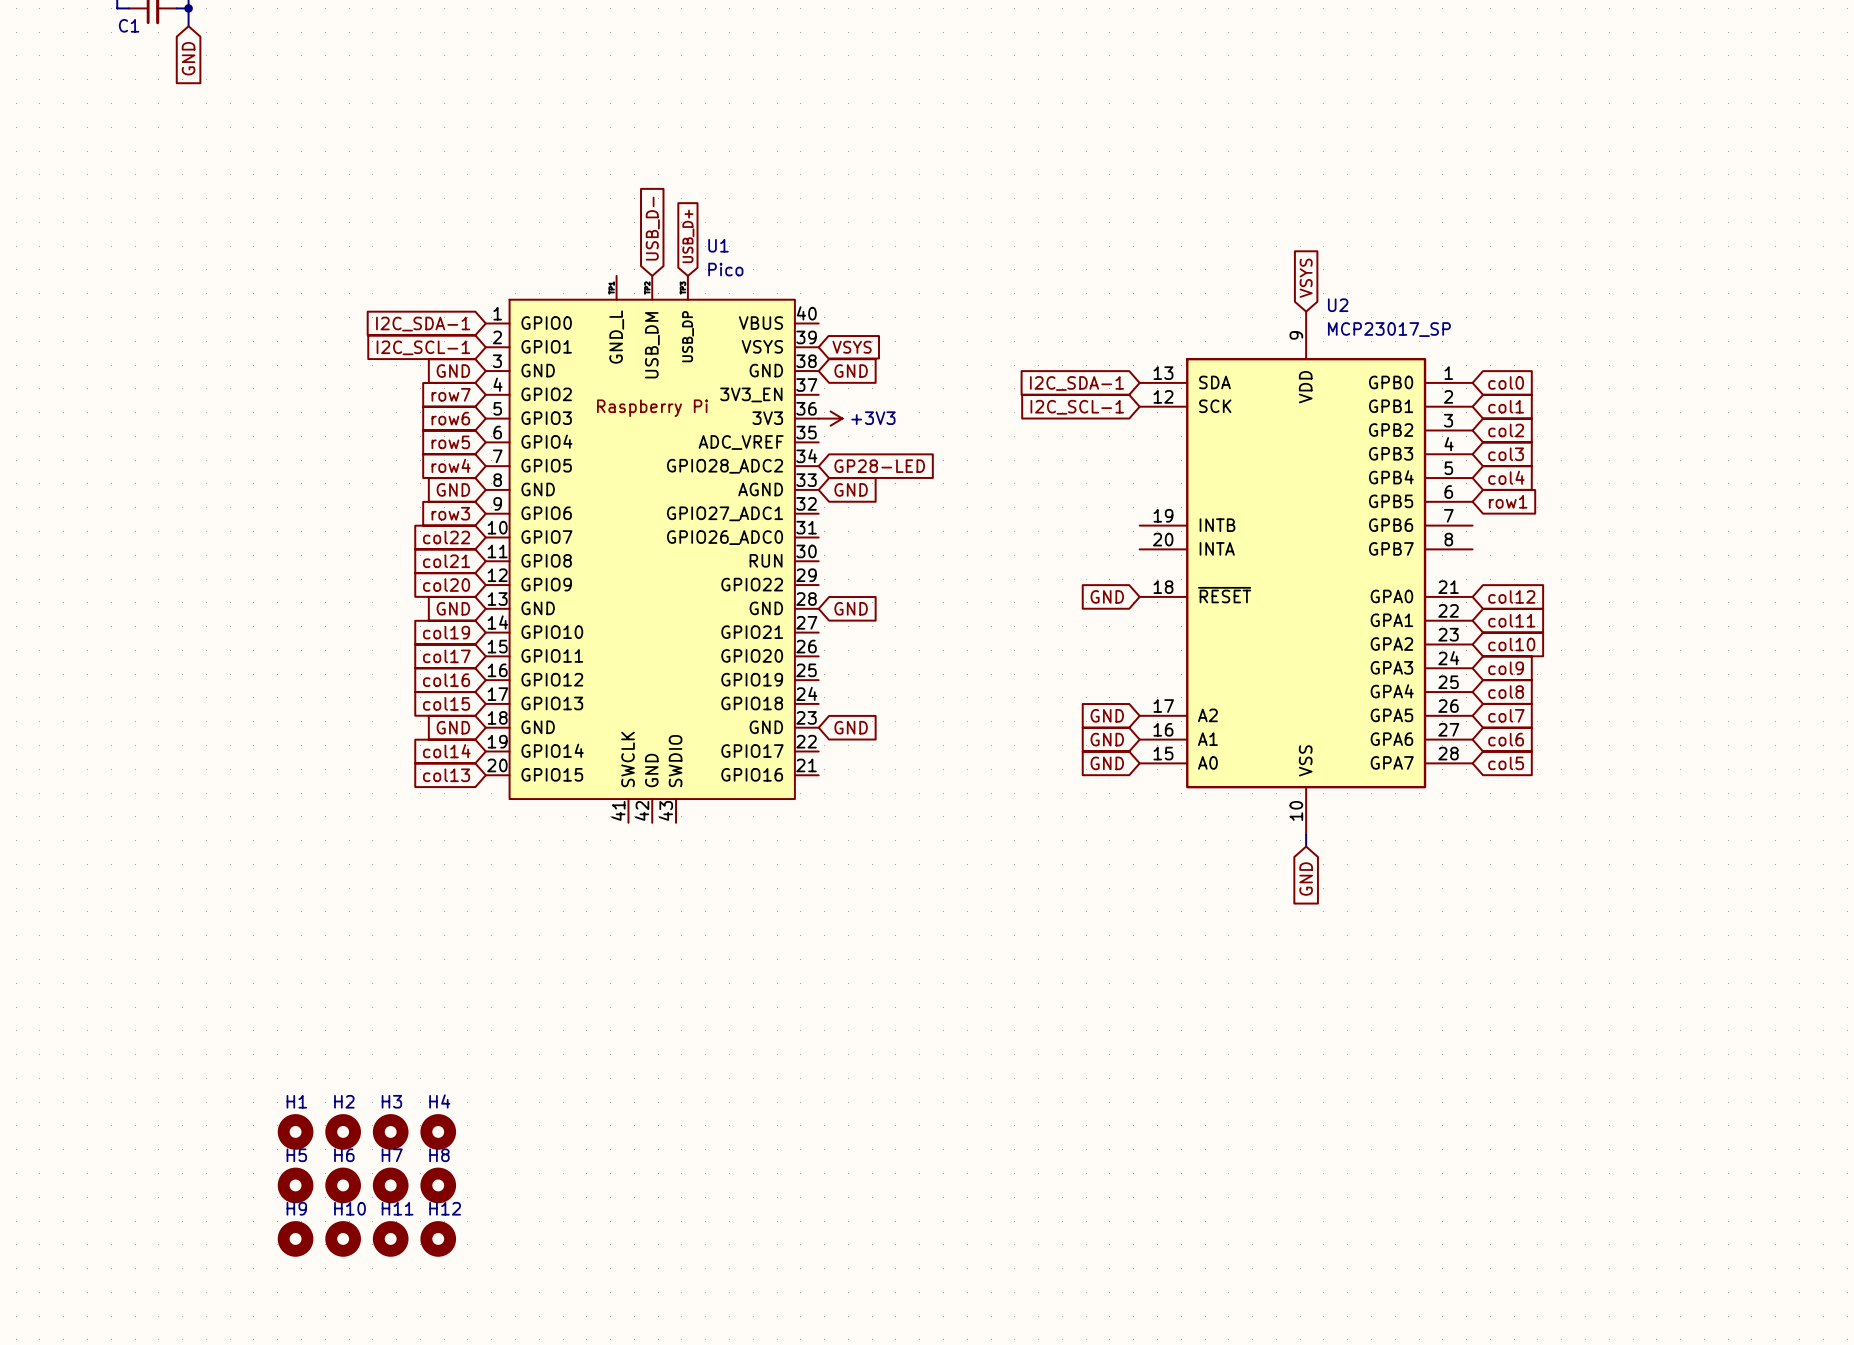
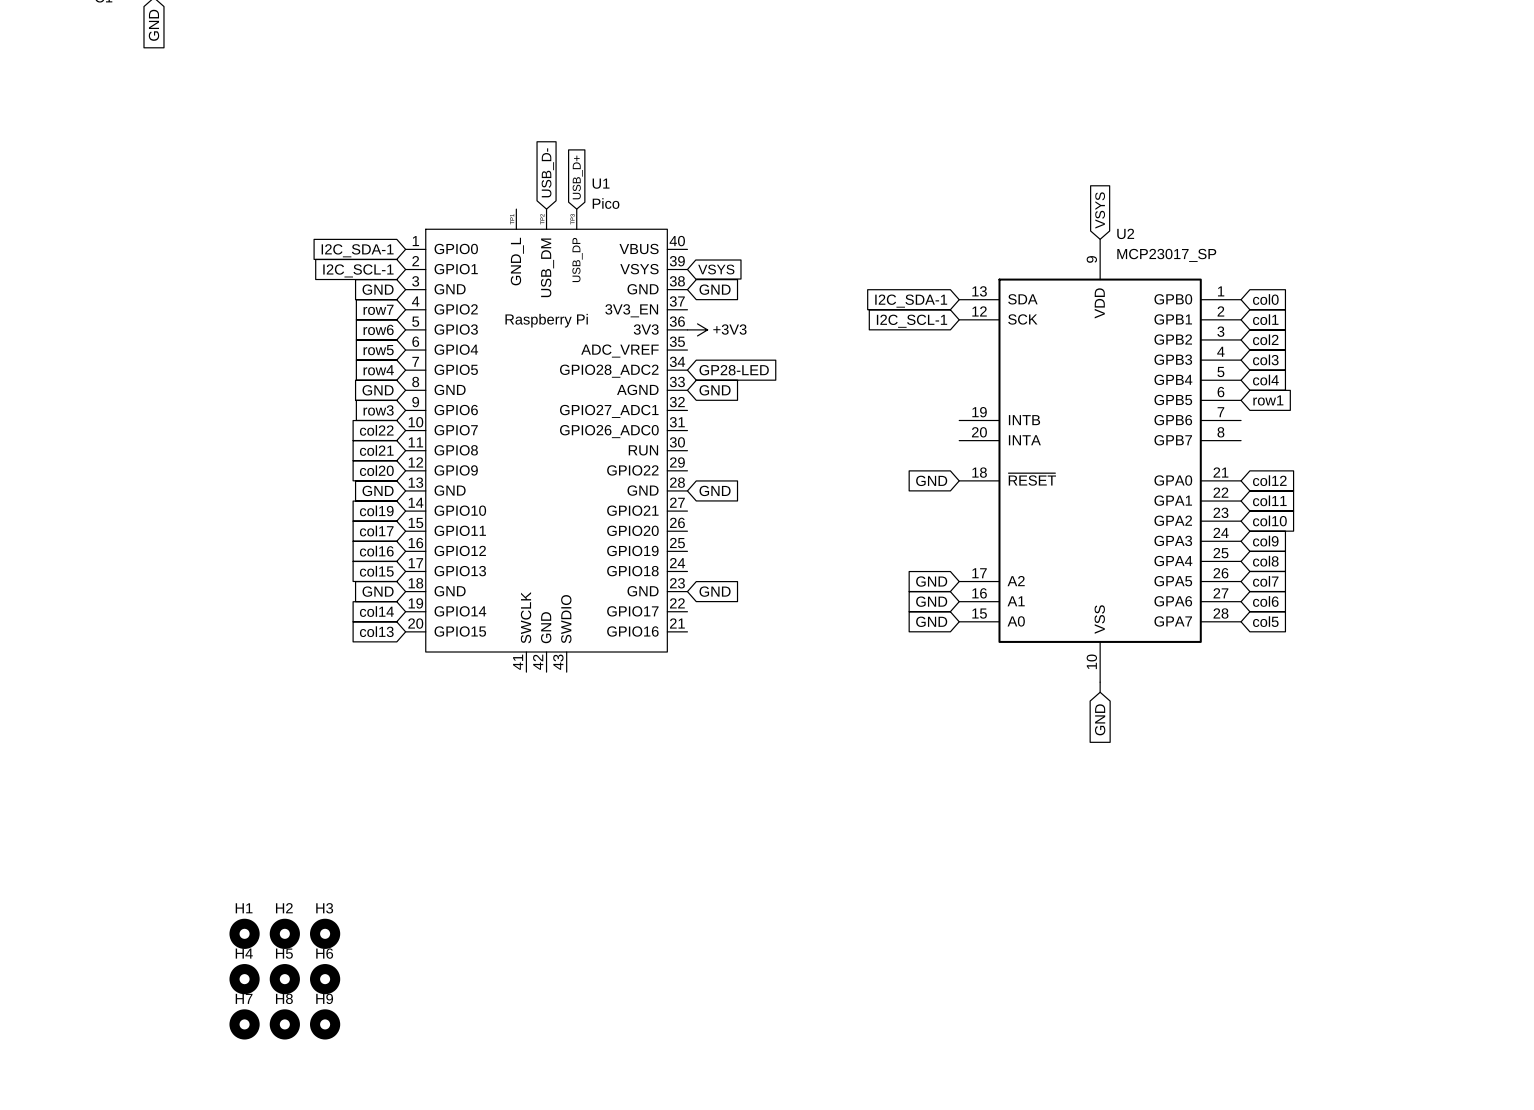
H4: (438, 1131) -> none
H5 name: H5 (296, 1155) -> H4 (244, 953)
H6 name: H6 (344, 1155) -> H5 (284, 953)
H7 name: H7 (392, 1155) -> H6 (324, 953)
H8: (438, 1185) -> none
H9 name: H9 (296, 1208) -> H7 (244, 998)
H10 name: H10 (350, 1208) -> H8 (284, 998)
H11 name: H11 (397, 1208) -> H9 (324, 998)
H12: (438, 1238) -> none

